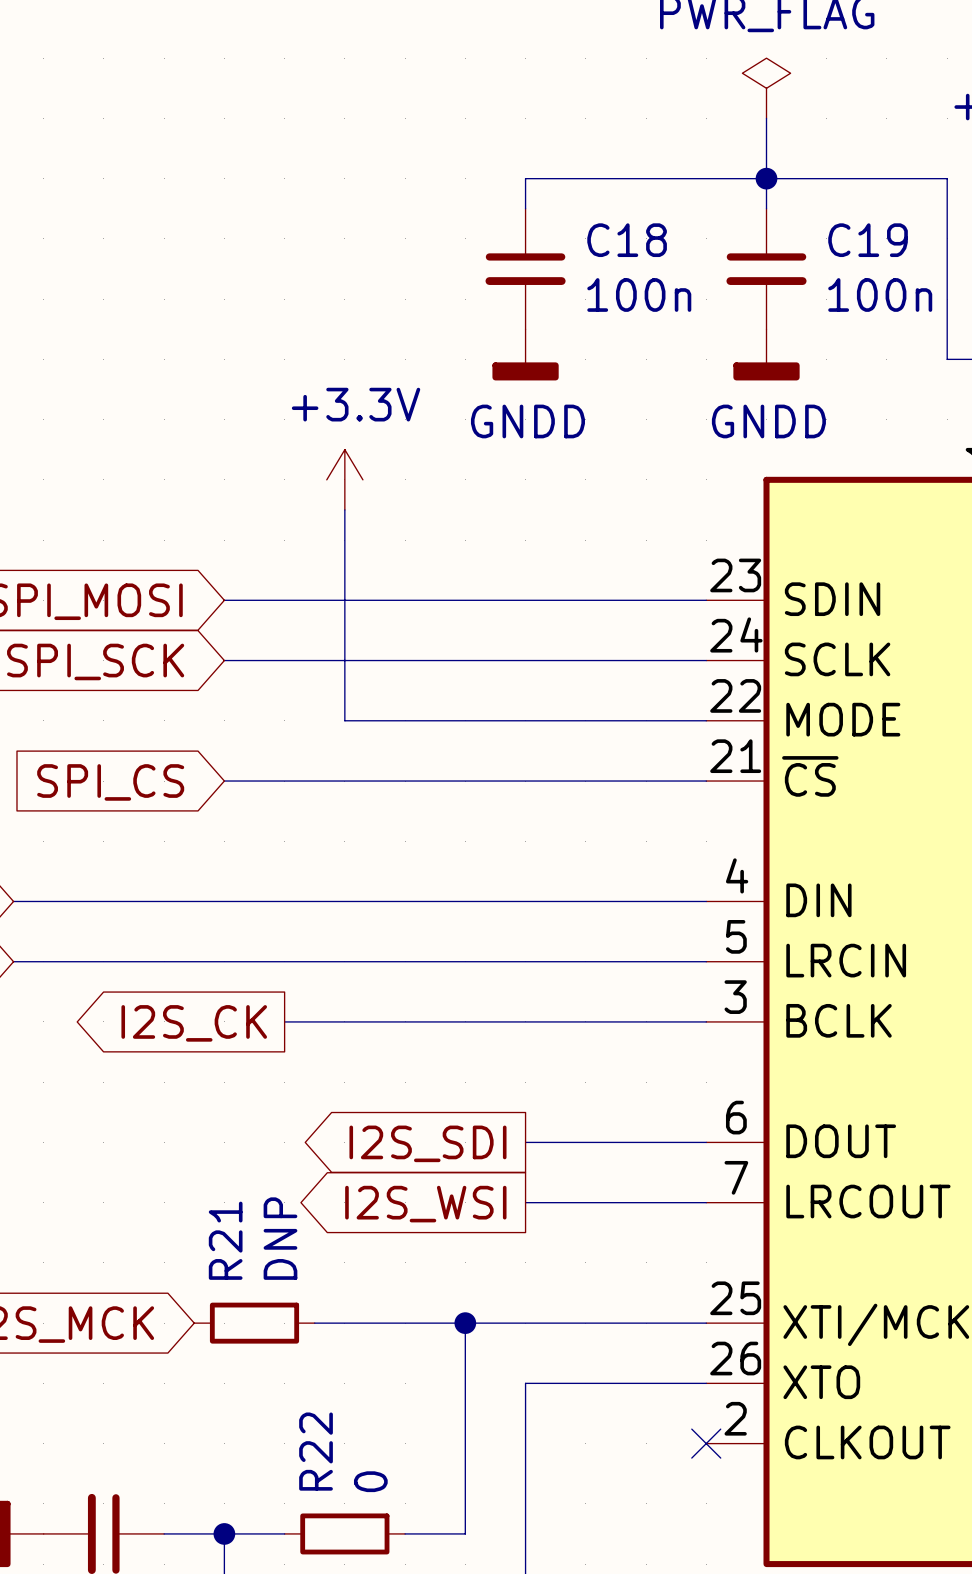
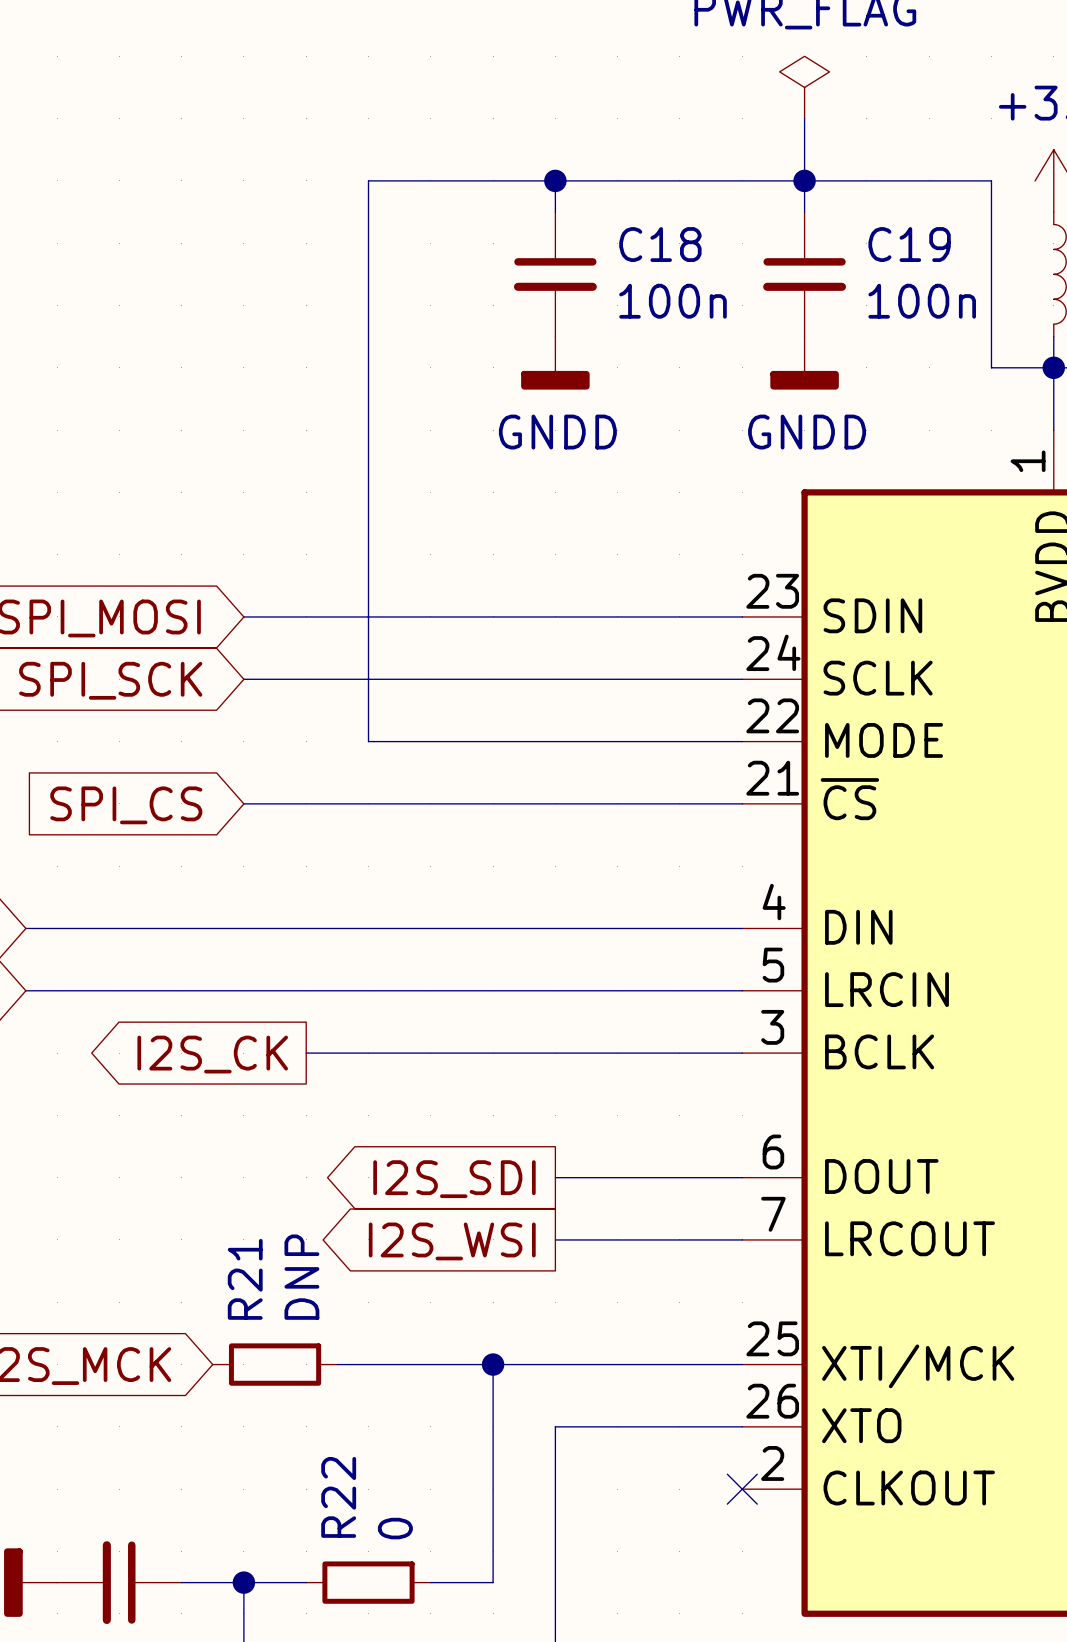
wire: none -> (555, 180) (368, 180) (368, 523)
junction: none -> (555, 180)
power symbol: +3.3V (344, 479) -> none

